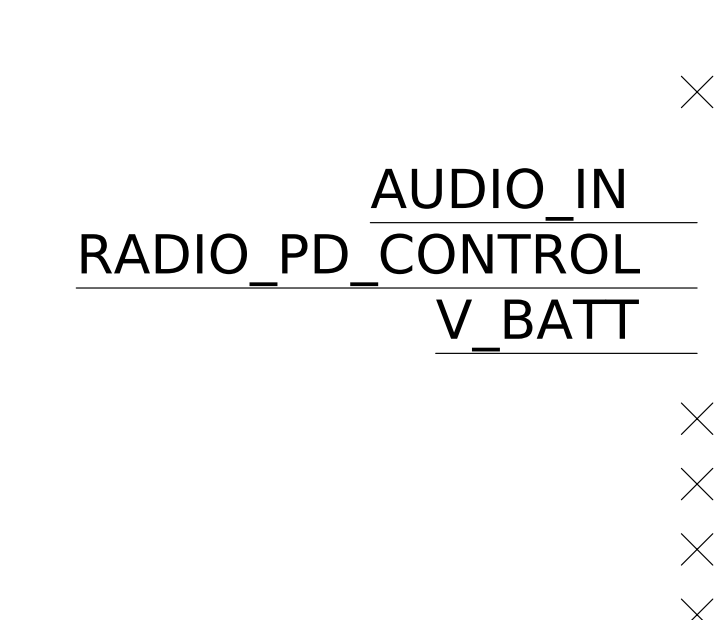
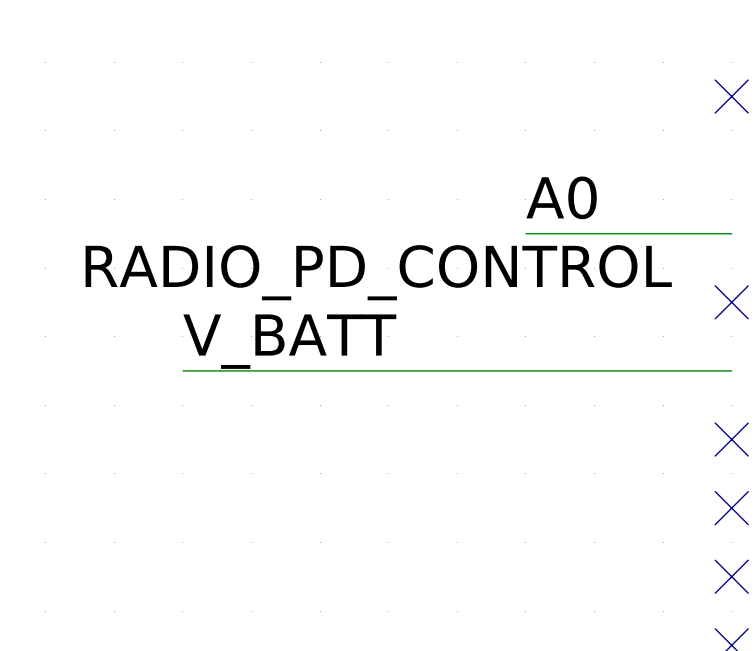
label: none -> A0 (561, 197)
label: AUDIO_IN (497, 194) -> none
wire: (370, 222) (501, 222) -> none
wire: (76, 288) (697, 288) -> none
no-connect mark: none -> (731, 302)
label position: V_BATT (537, 325) -> V_BATT (289, 341)
wire: none -> (182, 370) (457, 370)

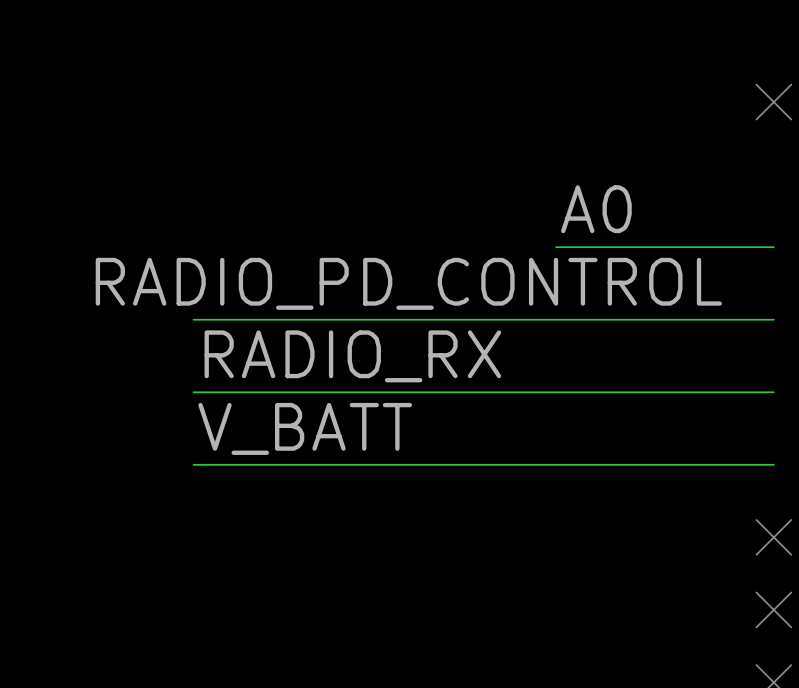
wire: none -> (193, 319) (773, 319)
no-connect mark: (731, 302) -> none
label: V_BATT (289, 341) -> RADIO_RX (352, 356)
label: none -> V_BATT (305, 428)
wire: none -> (193, 464) (773, 464)
no-connect mark: (731, 439) -> none

